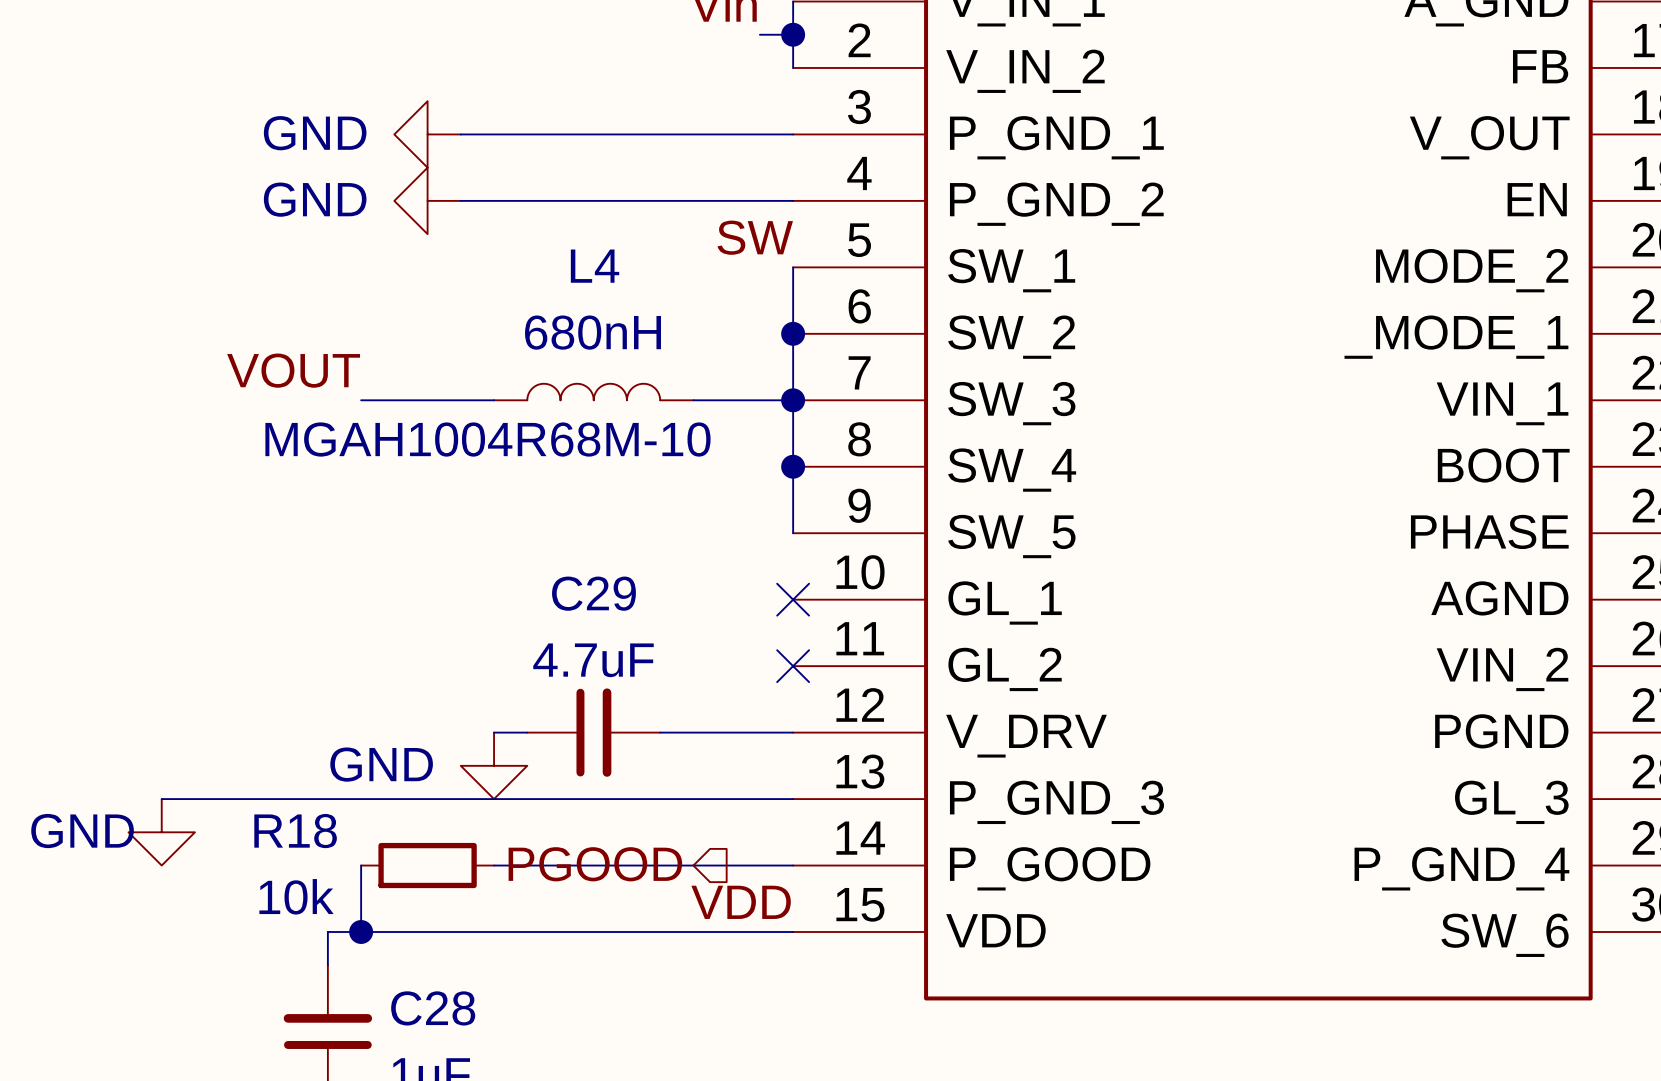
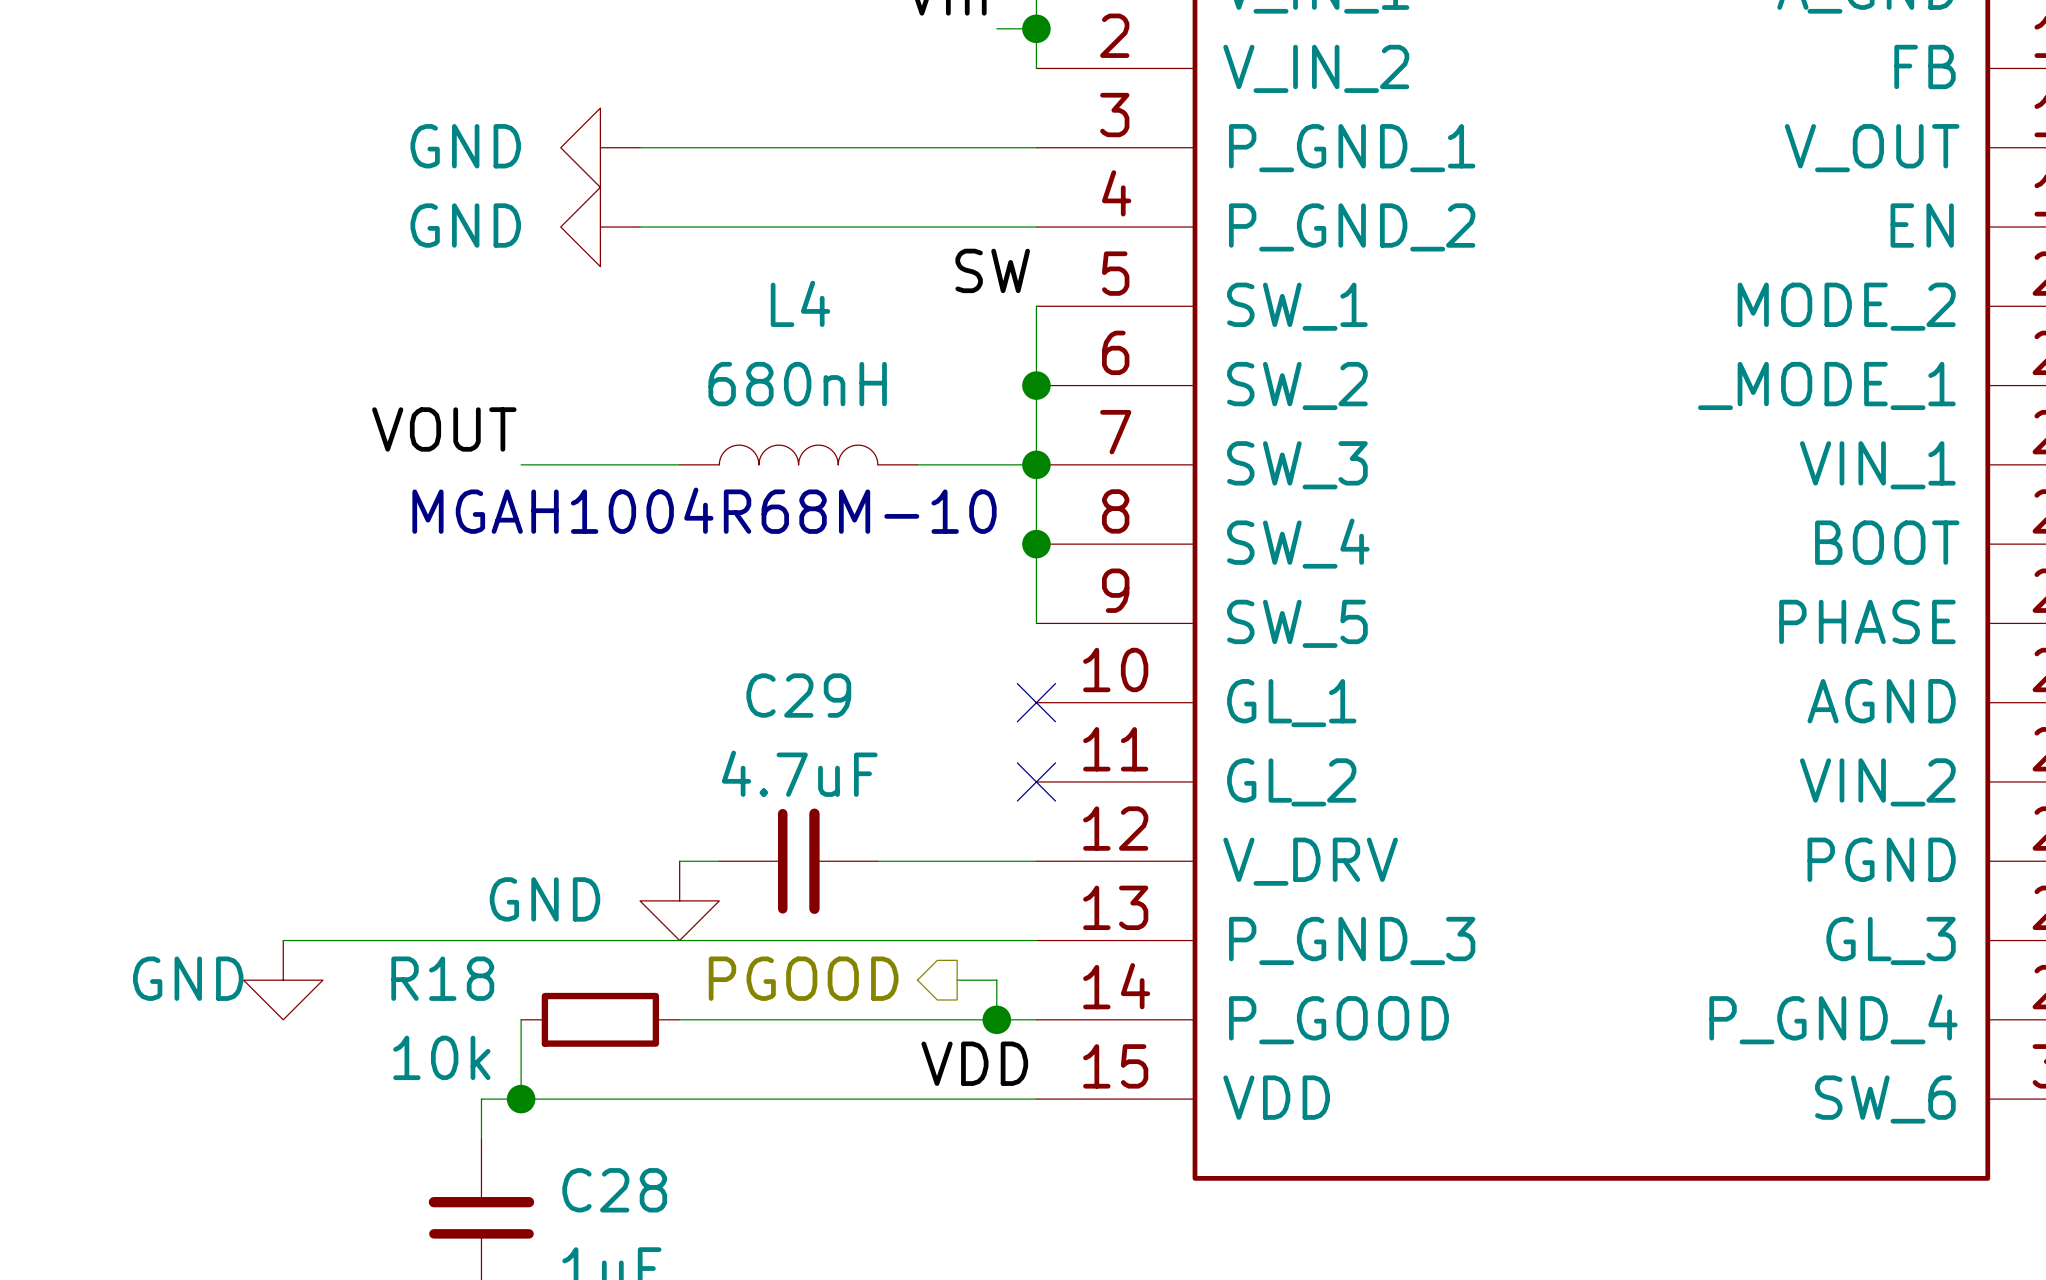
wire: none -> (957, 980) (996, 980) (996, 1019)
hierarchical label position: PGOOD (595, 864) -> PGOOD (803, 978)
junction: none -> (996, 1019)

